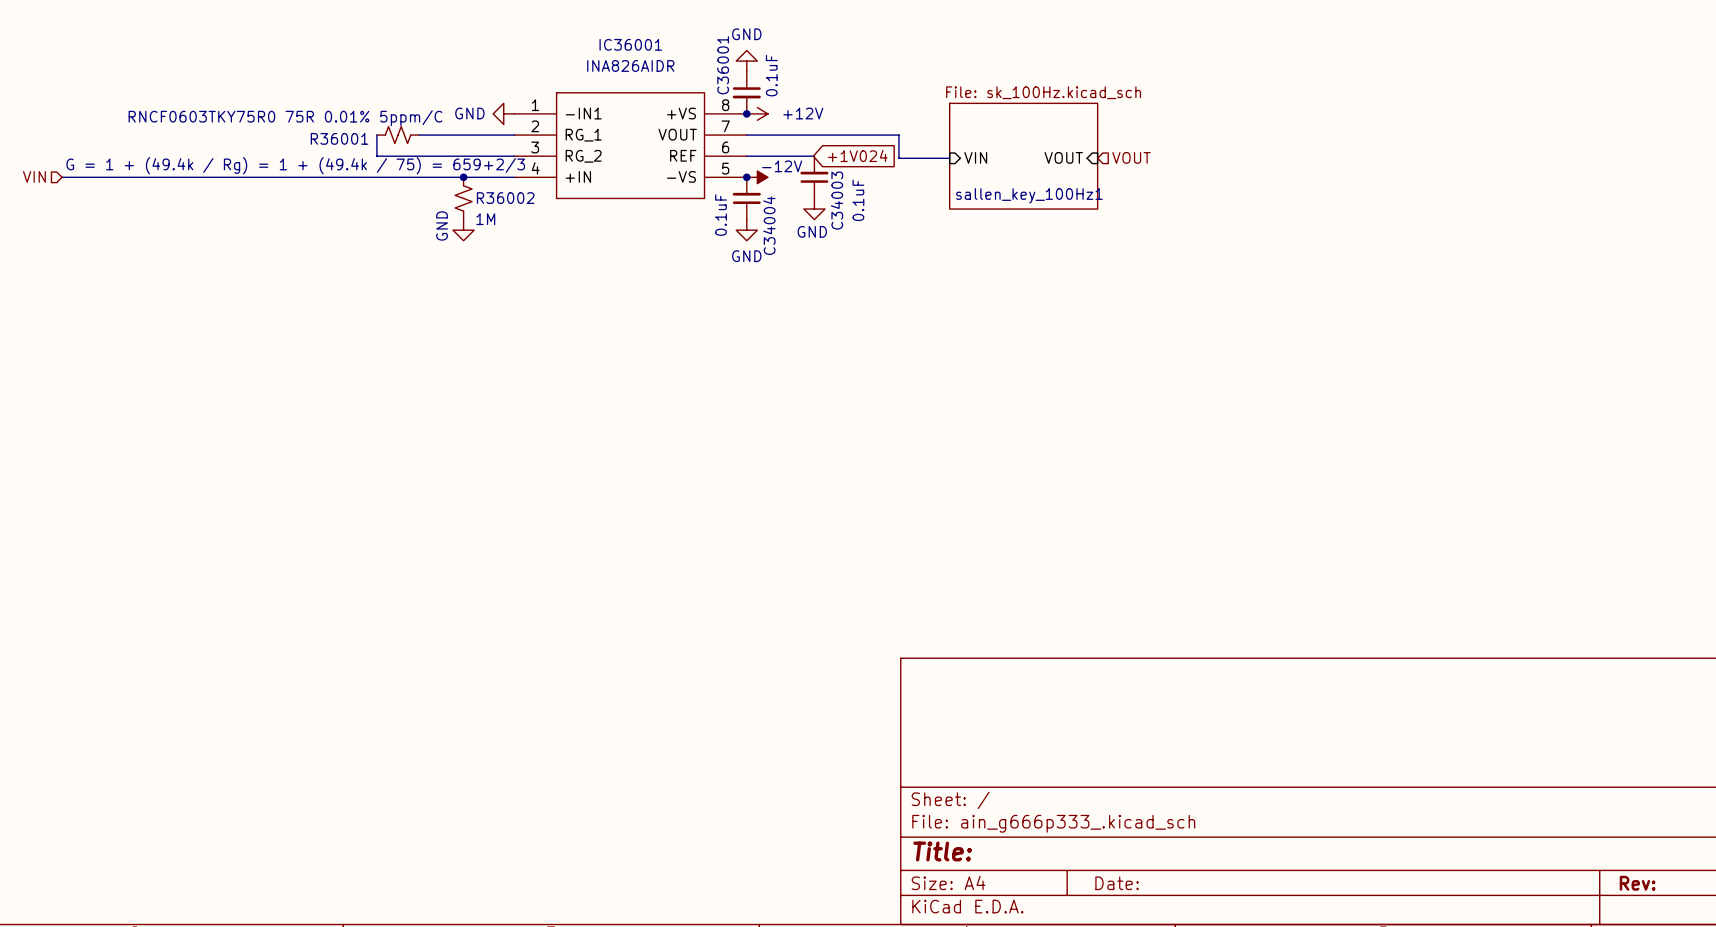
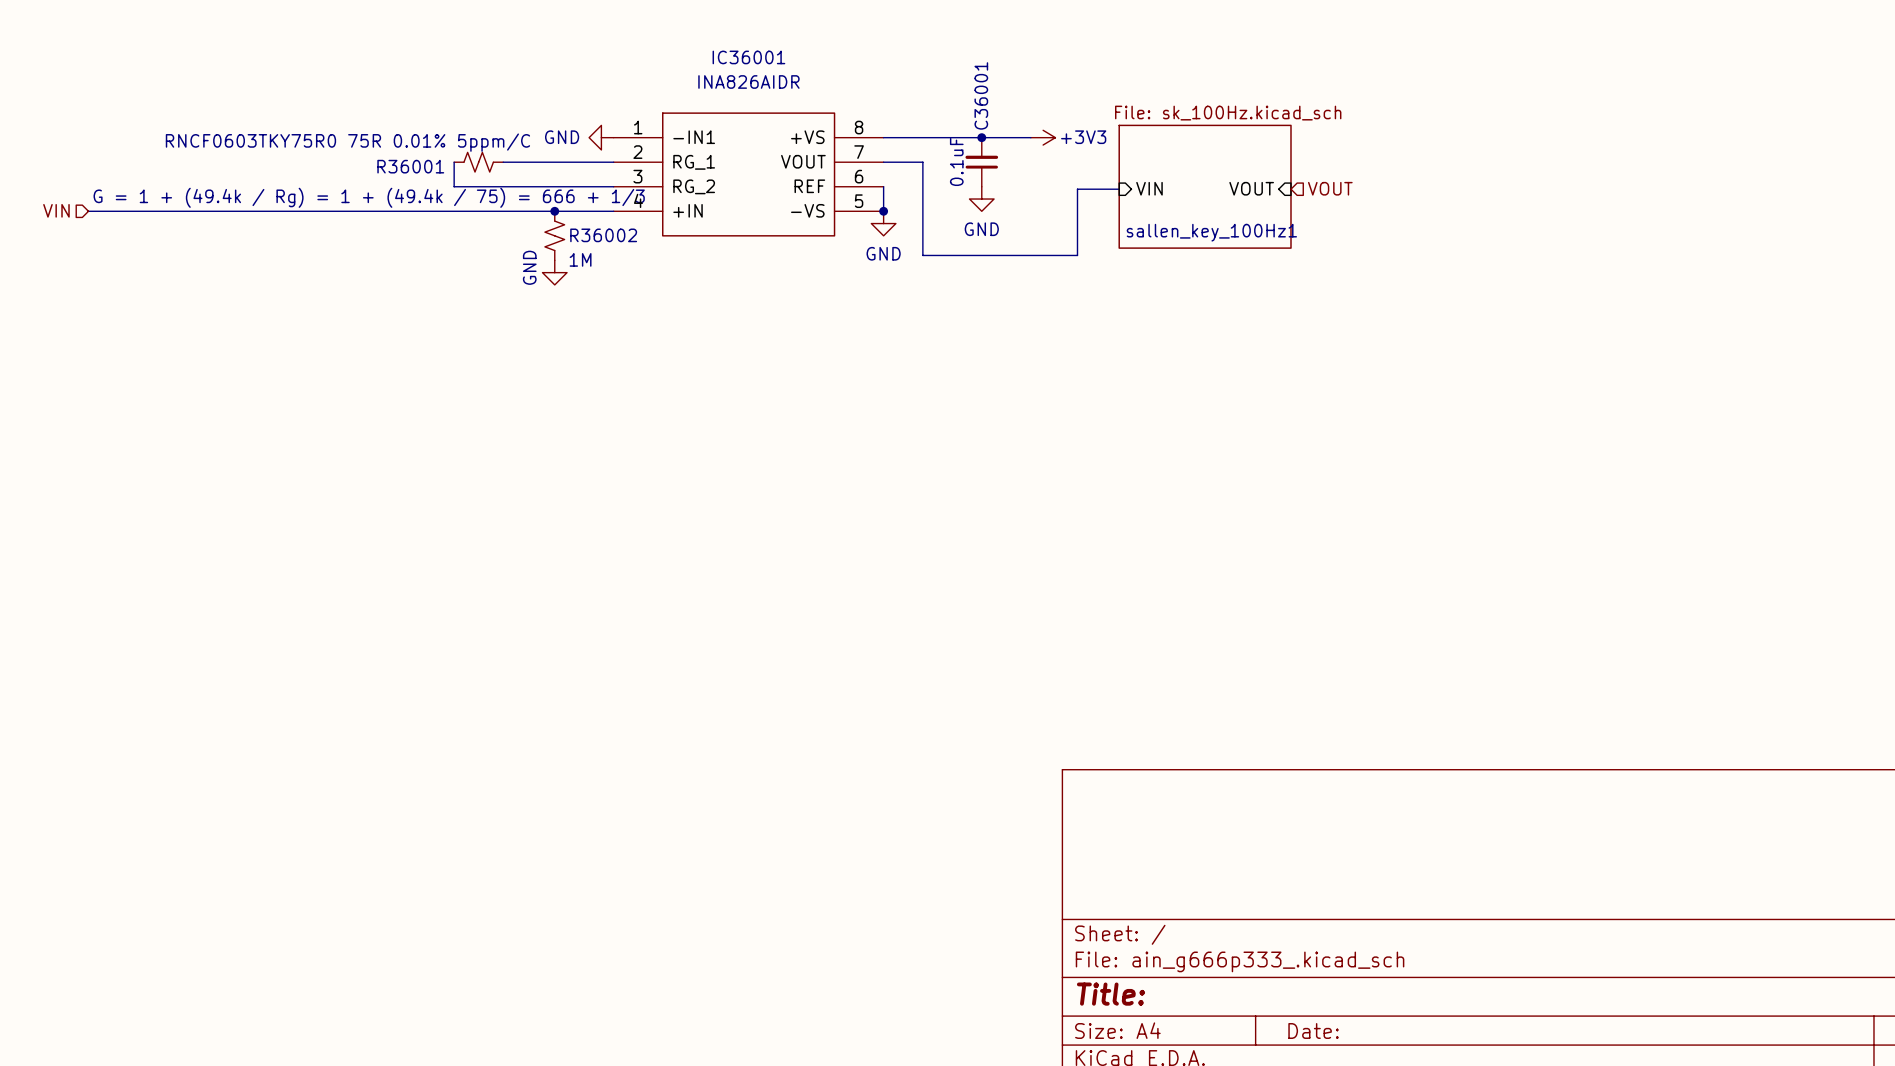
power symbol: GND (746, 61) -> none
C36001 name position: C36001 (723, 65) -> C36001 (981, 95)
C36001 value position: 0.1uF (771, 75) -> 0.1uF (956, 161)
C36001 rotation: 0° (746, 92) -> 180° (981, 162)
C36001 position: (746, 92) -> (981, 162)
wire: none -> (883, 137) (1030, 137)
junction: (746, 113) -> none
power symbol: +12V (757, 113) -> none
junction: none -> (981, 137)
power symbol: none -> +3V3 (1043, 137)
wire: (780, 135) (898, 135) (898, 158) (913, 158) -> (922, 162) (922, 255) (1077, 255) (1077, 189)
global label: +1V024 (857, 155) -> none
wire: (746, 156) (814, 156) -> (883, 186) (883, 211)
text: G = 1 + (49.4k / Rg) = 1 + (49.4k / 75) = 659+2/3 (295, 165) -> G = 1 + (49.4k / Rg) = 1 + (49.4k / 75) = 666 + 1/3 (369, 197)
power symbol: none -> GND (981, 199)
power symbol: -12V (757, 177) -> none
C34003: 0.1uF (814, 177) -> none
power symbol: none -> GND (883, 223)
C34004: 0.1uF (746, 198) -> none
power symbol: GND (814, 209) -> none
power symbol: GND (746, 230) -> none

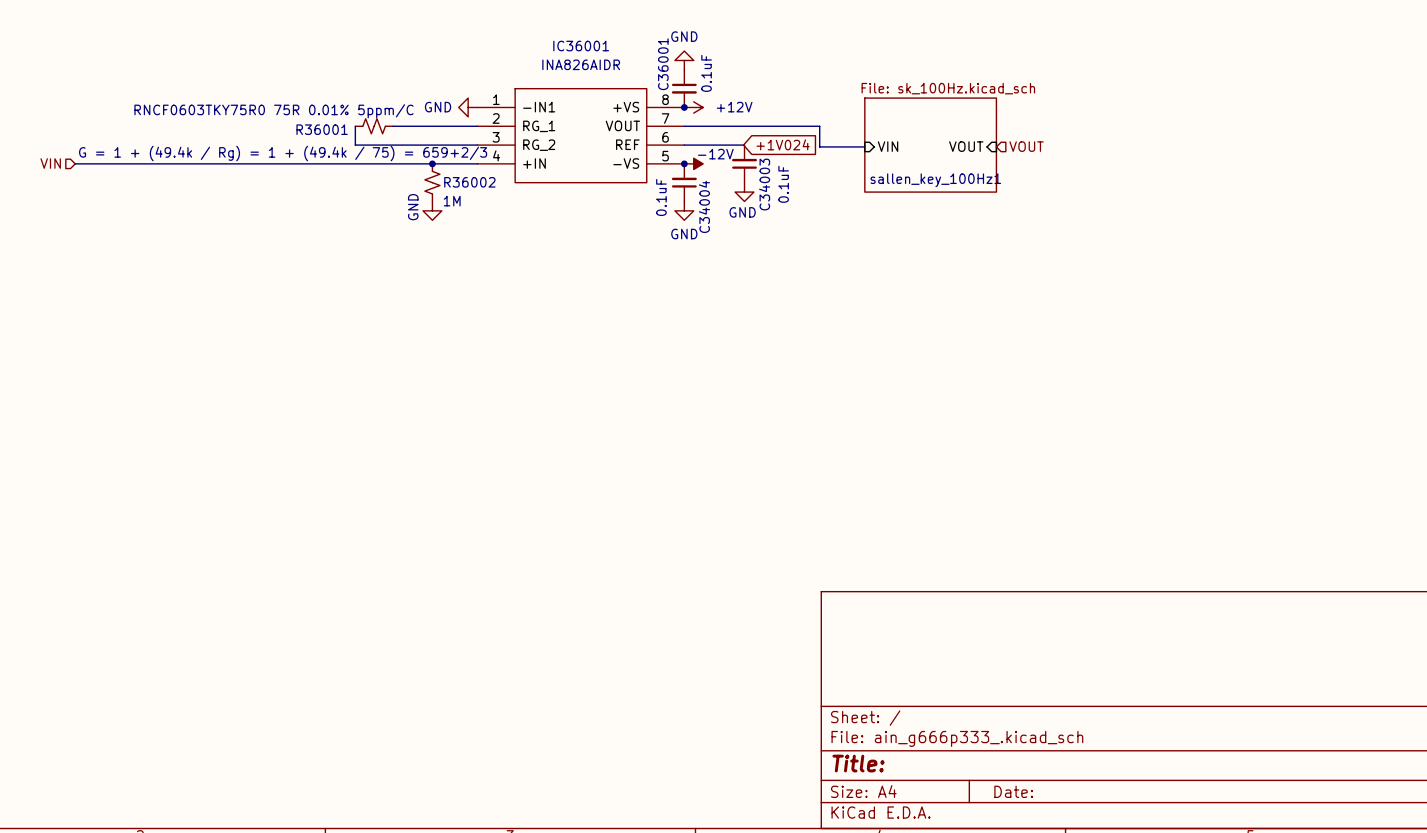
power symbol: none -> GND (684, 60)
C36001 name position: C36001 (981, 95) -> C36001 (663, 64)
wire: (883, 137) (1030, 137) -> none
junction: none -> (684, 107)
power symbol: none -> +12V (693, 107)
junction: (981, 137) -> none
power symbol: +3V3 (1043, 137) -> none
C36001 value position: 0.1uF (956, 161) -> 0.1uF (706, 73)
wire: (922, 162) (922, 255) (1077, 255) (1077, 189) -> (714, 126) (819, 126) (819, 146) (832, 146)
C36001 rotation: 0° (981, 162) -> 180° (684, 88)
C36001 position: (981, 162) -> (684, 88)
wire: (883, 186) (883, 211) -> (684, 145) (744, 145)
global label: none -> +1V024 (783, 144)
text: G = 1 + (49.4k / Rg) = 1 + (49.4k / 75) = 666 + 1/3 (369, 197) -> G = 1 + (49.4k / Rg) = 1 + (49.4k / 75) = 659+2/3 (283, 153)
power symbol: GND (981, 199) -> none
power symbol: none -> -12V (693, 163)
C34003: none -> 0.1uF (744, 163)
power symbol: GND (883, 223) -> none
C34004: none -> 0.1uF (684, 182)
power symbol: none -> GND (744, 192)
power symbol: none -> GND (684, 210)

